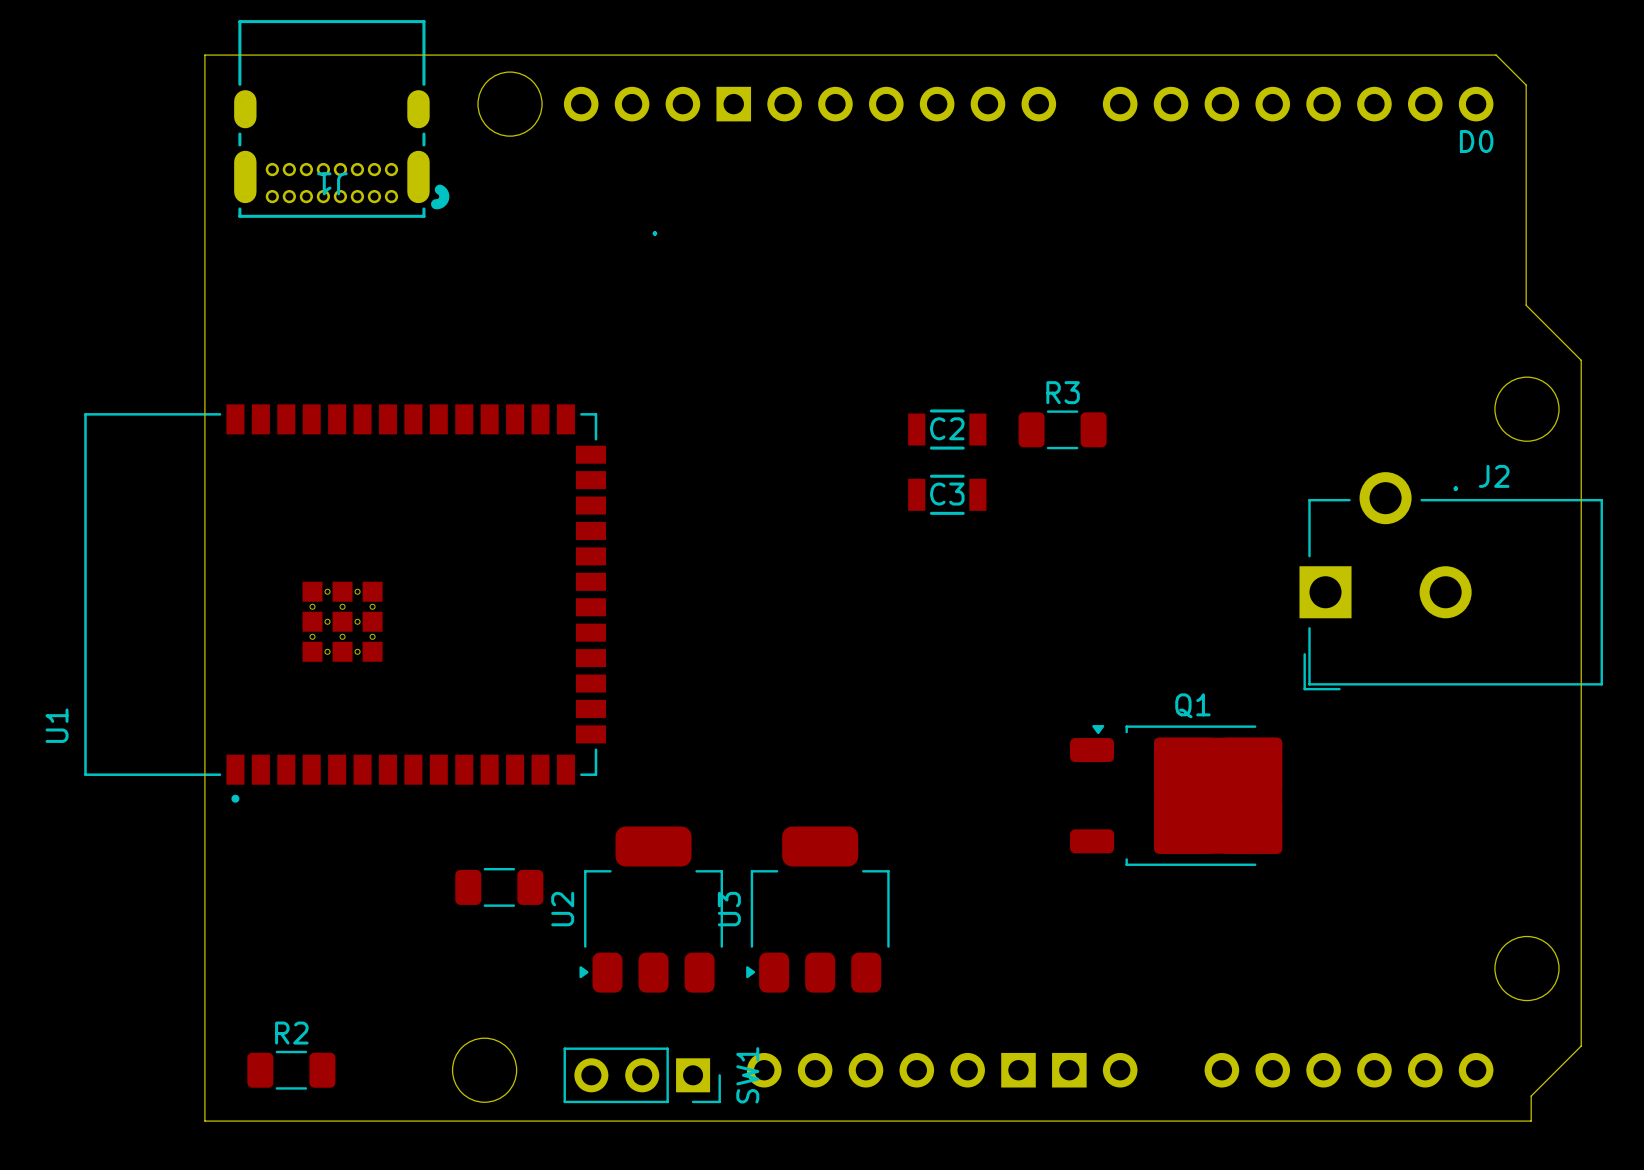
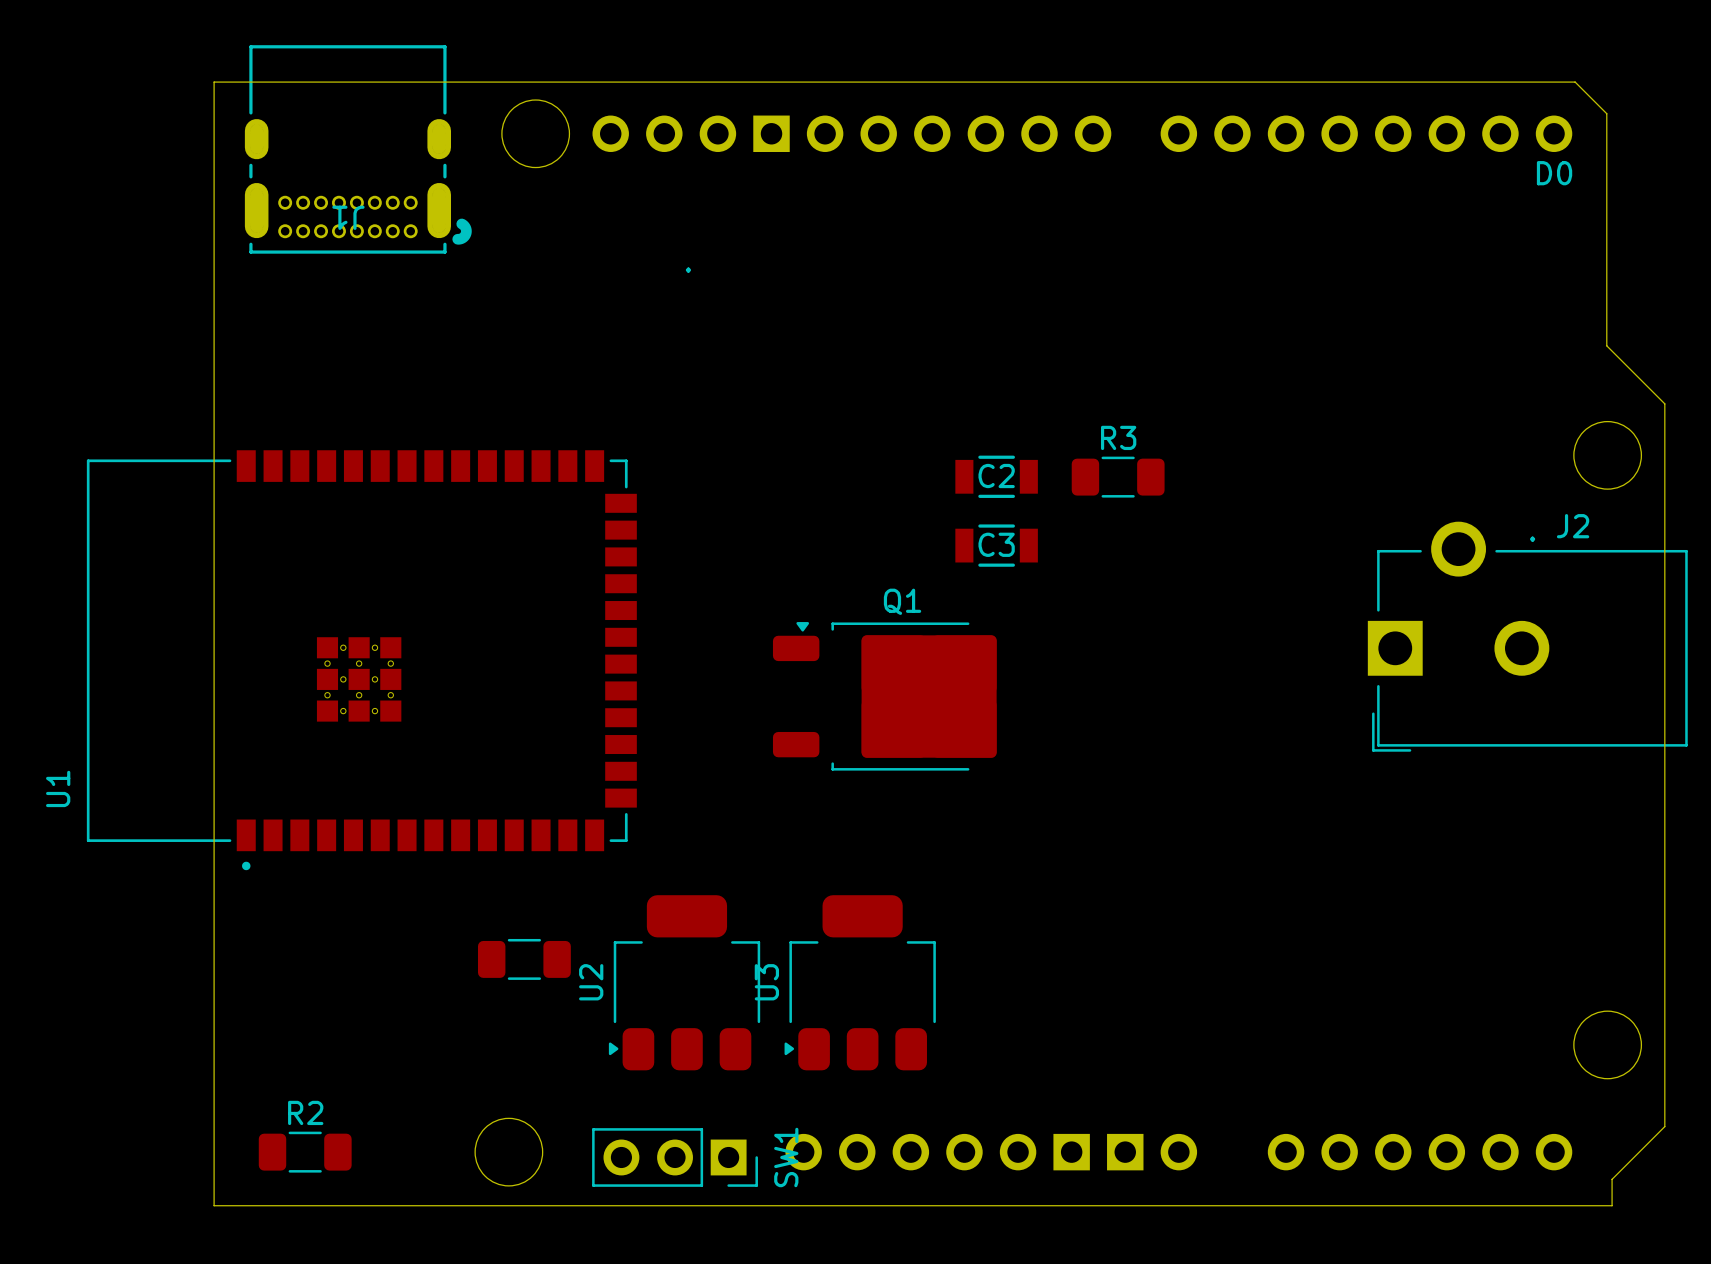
Q1 position: (1176, 795) -> (884, 696)

